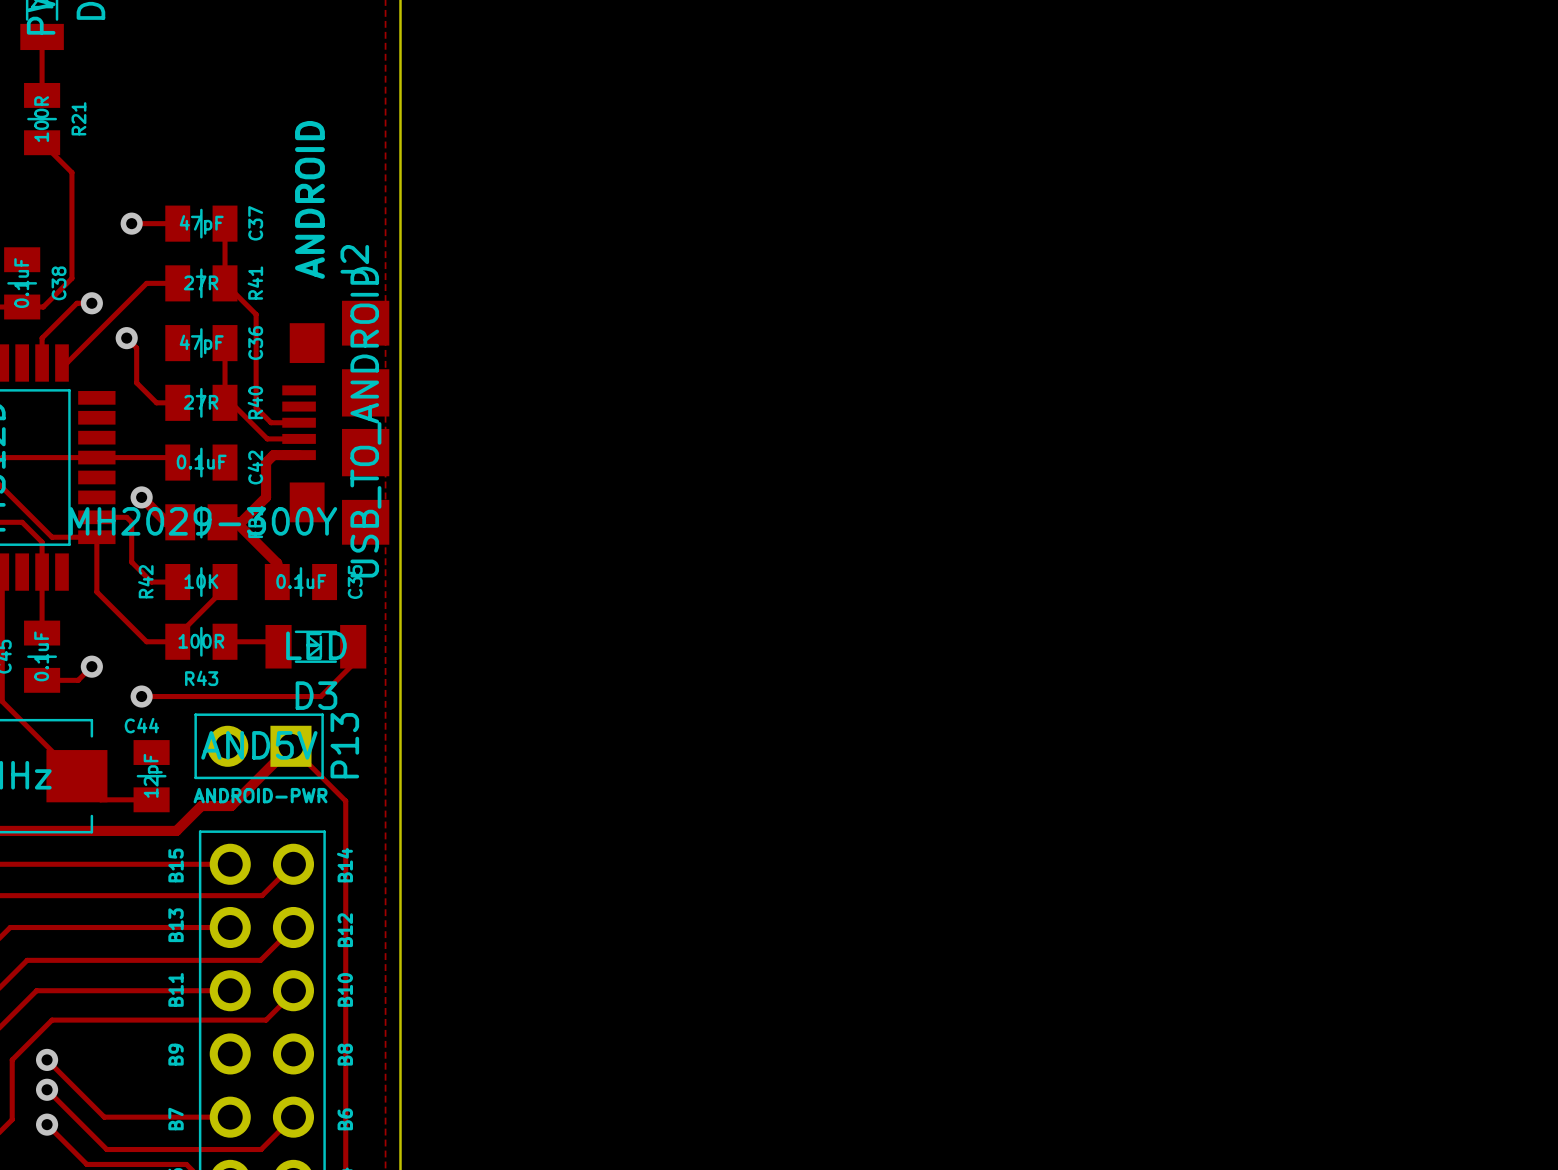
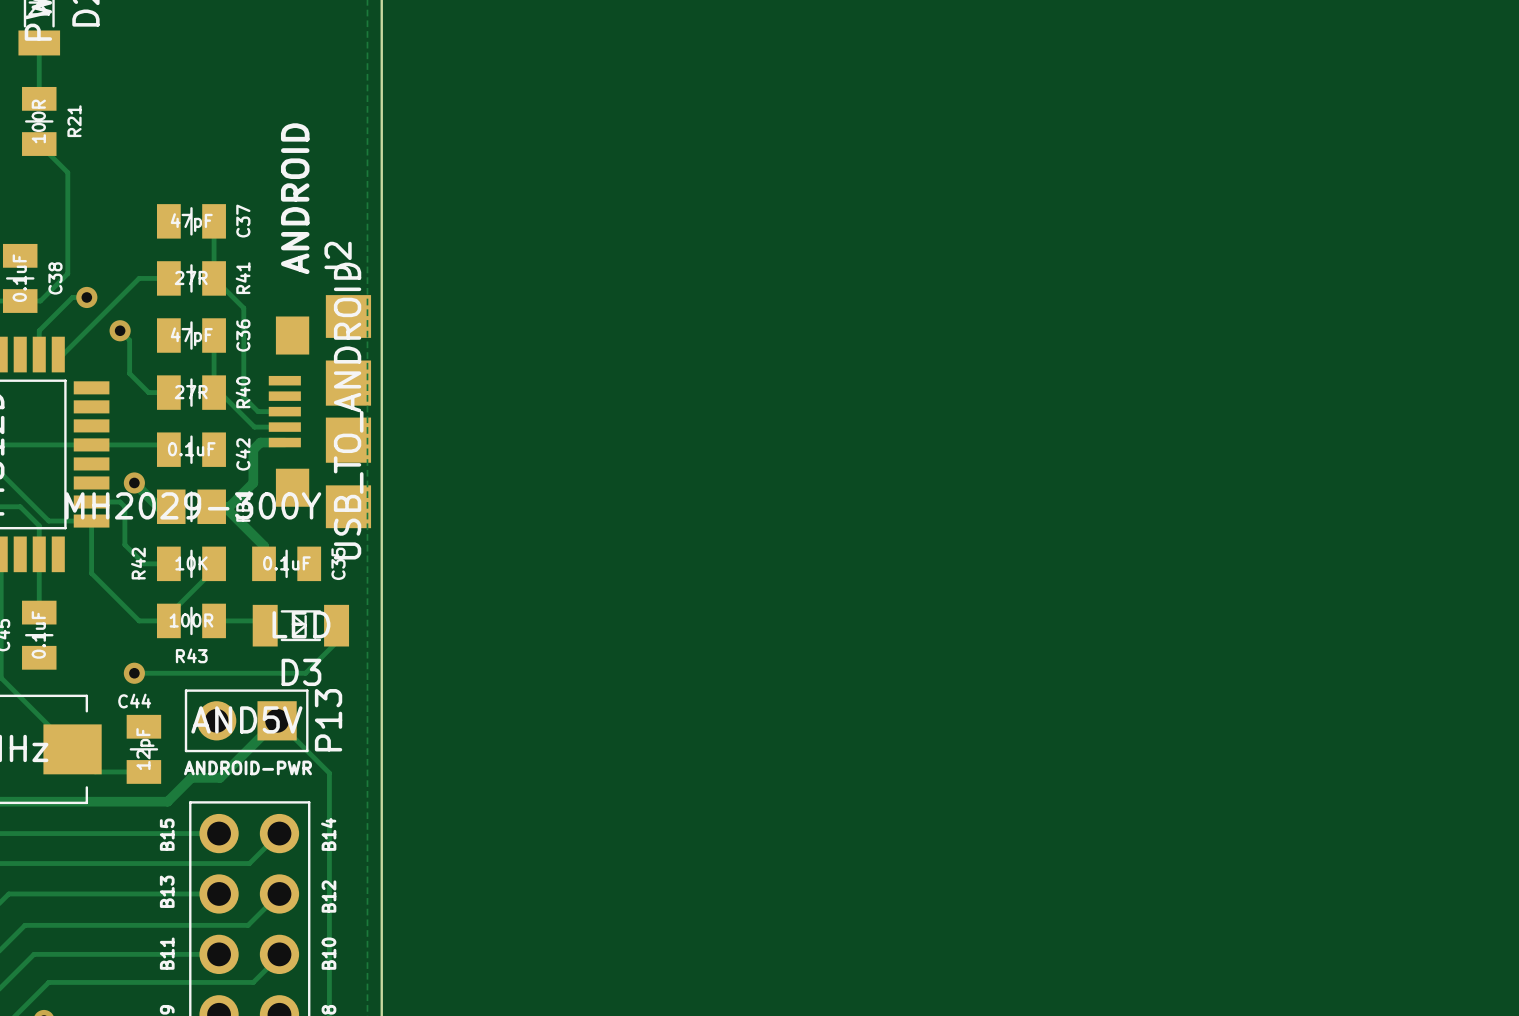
track: (131, 223) (177, 223) -> none
via: (131, 223) -> none
track: (91, 666) (78, 680) (42, 680) -> none
via: (91, 666) -> none

